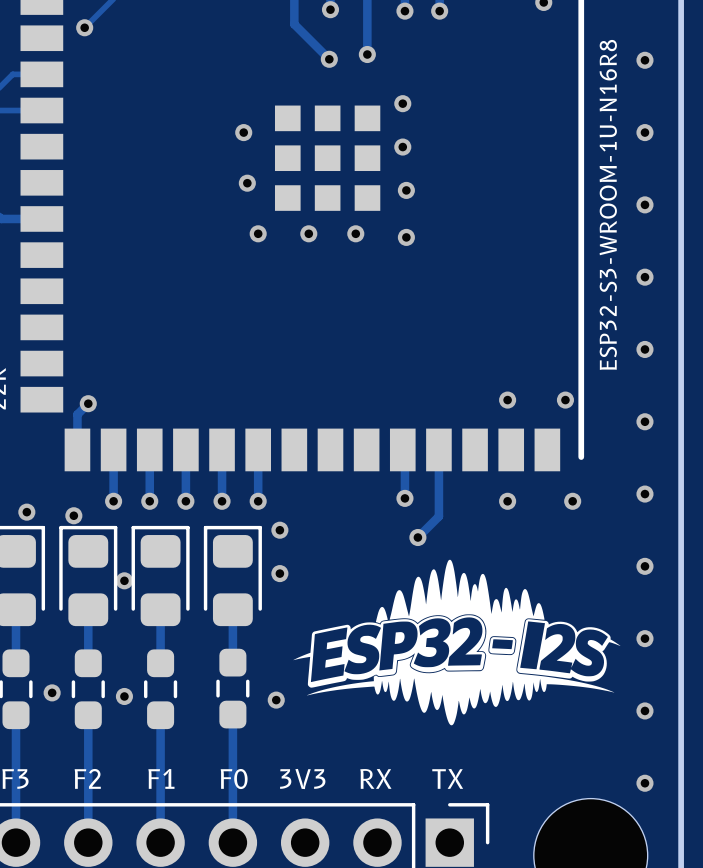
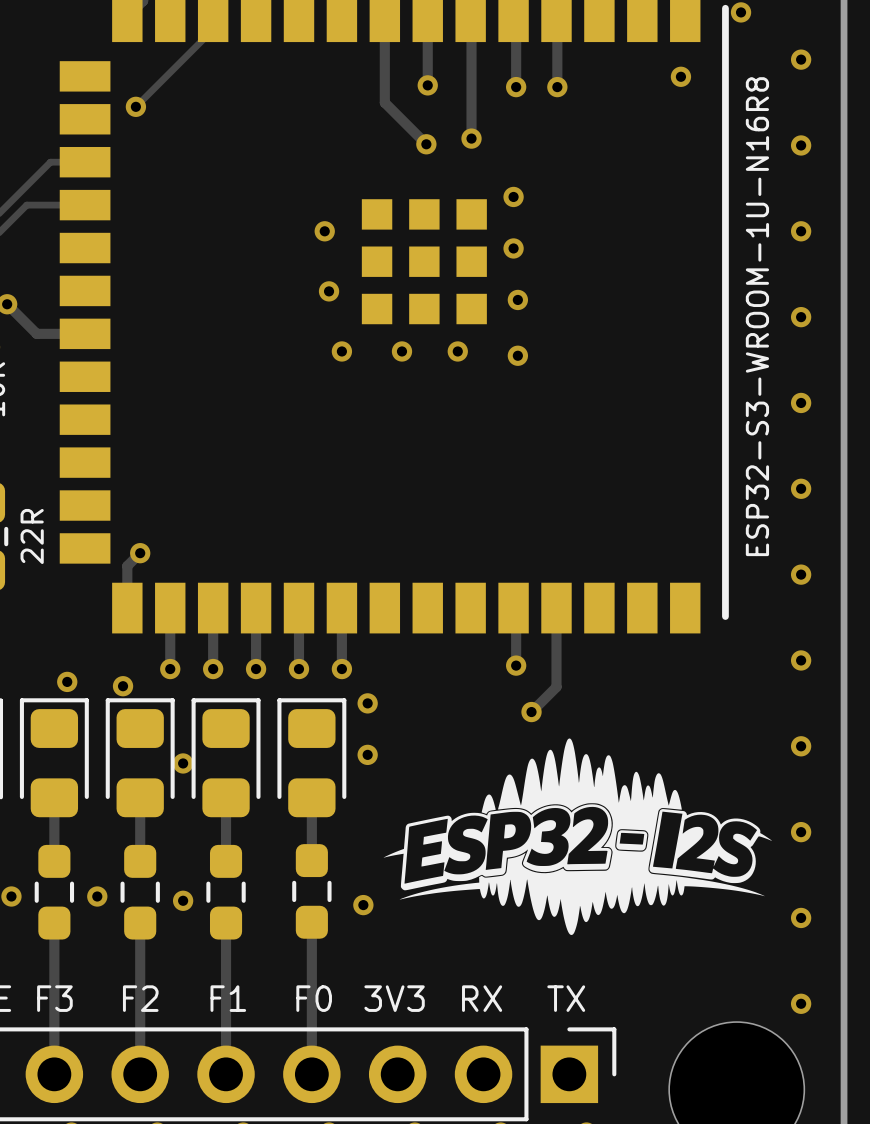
via: (507, 400) -> none
via: (565, 400) -> none
via: (507, 501) -> none
via: (572, 501) -> none

